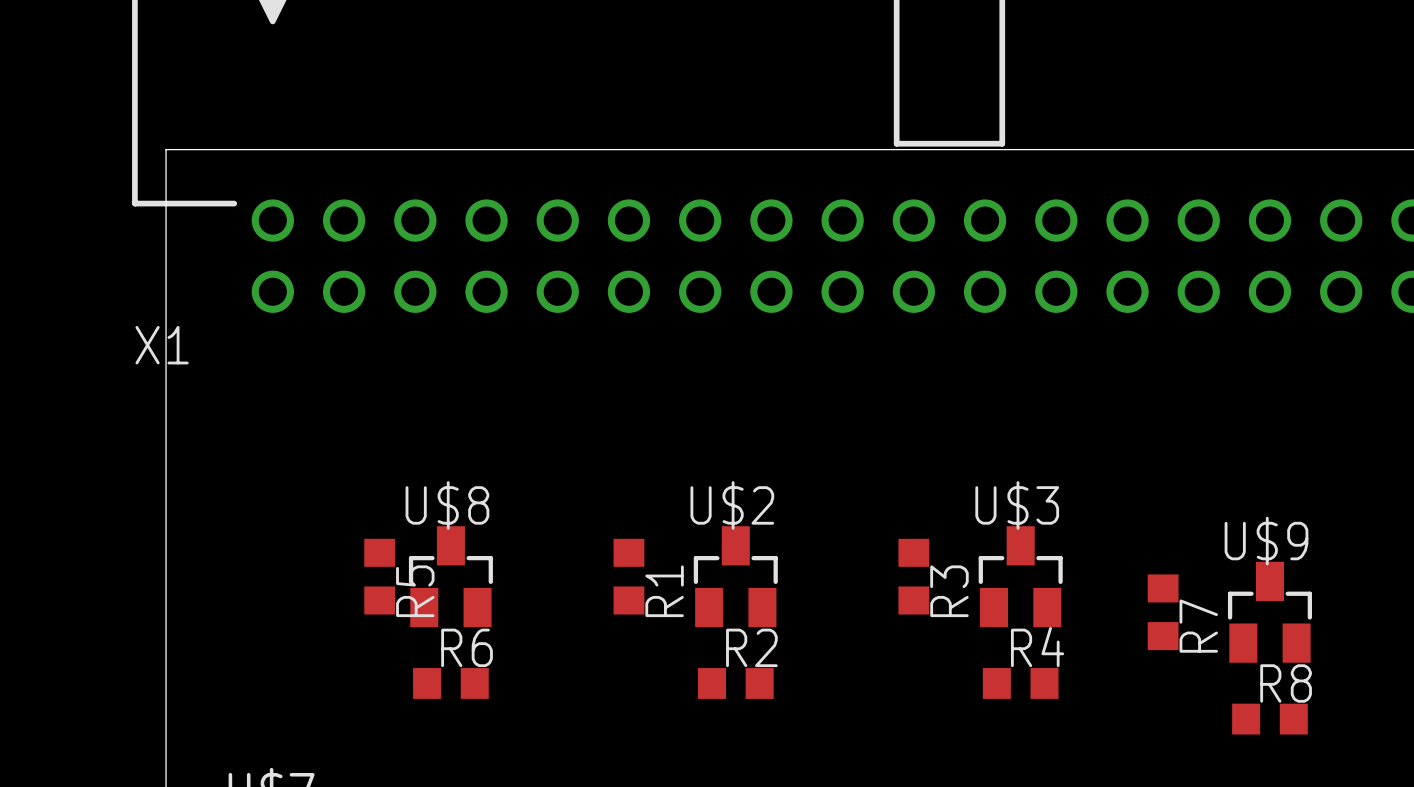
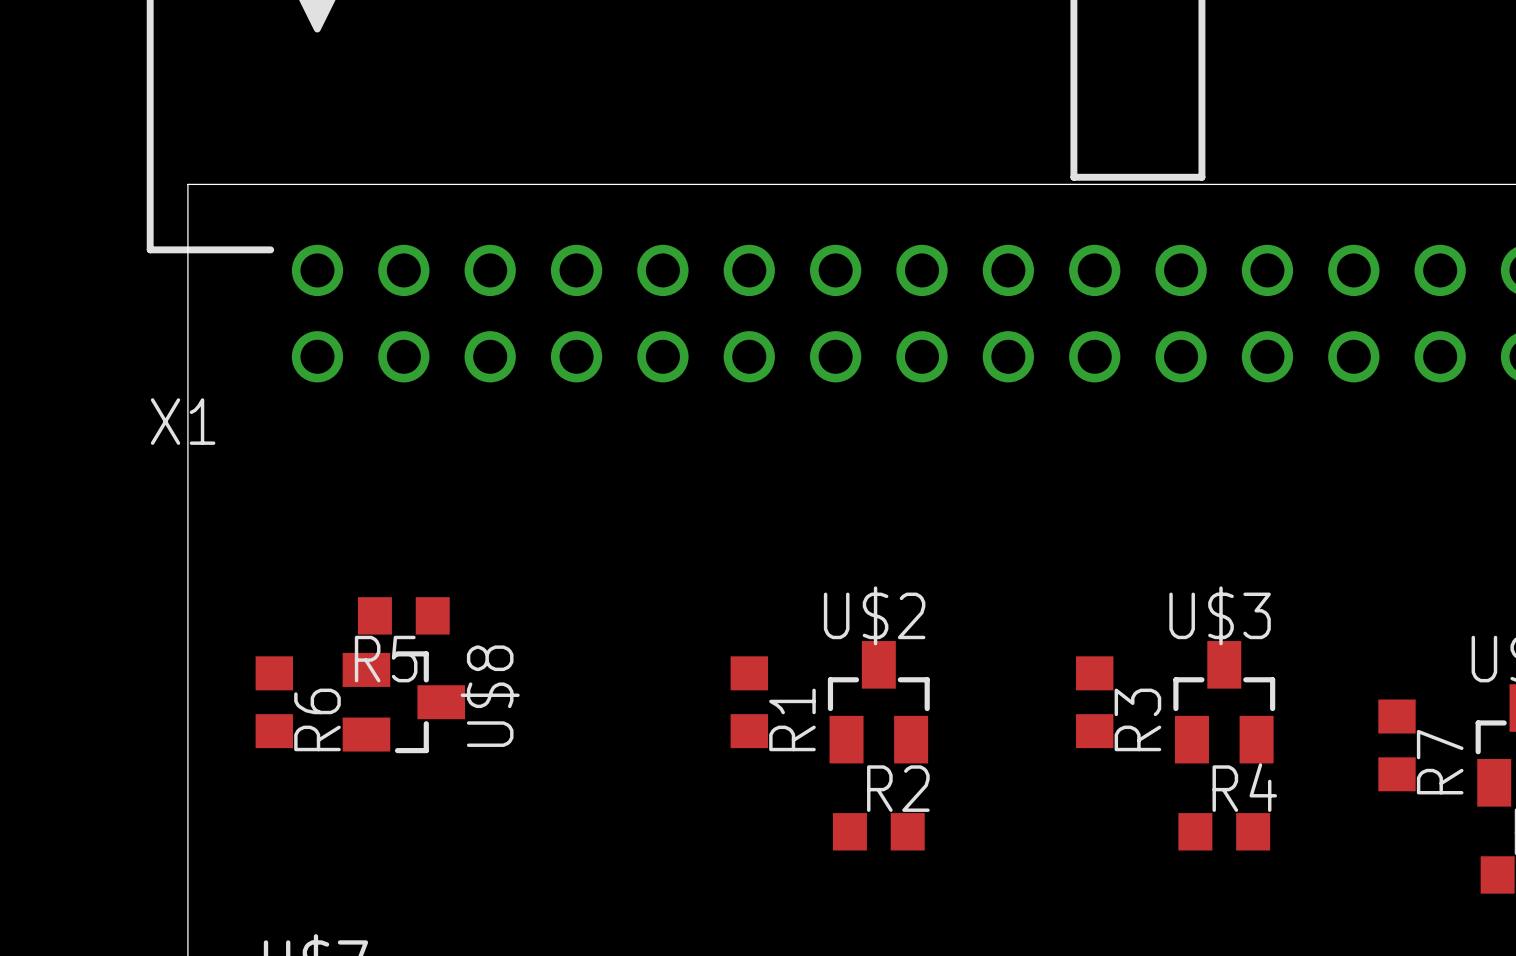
R5 rotation: 0° (379, 576) -> 90° clockwise (403, 615)
R5 position: (379, 576) -> (403, 615)
U$8 rotation: 0° (450, 576) -> 90° clockwise (403, 702)
U$8 position: (450, 576) -> (403, 702)
R6 rotation: 0° (450, 683) -> 90° clockwise (274, 702)
R6 position: (450, 683) -> (274, 702)

